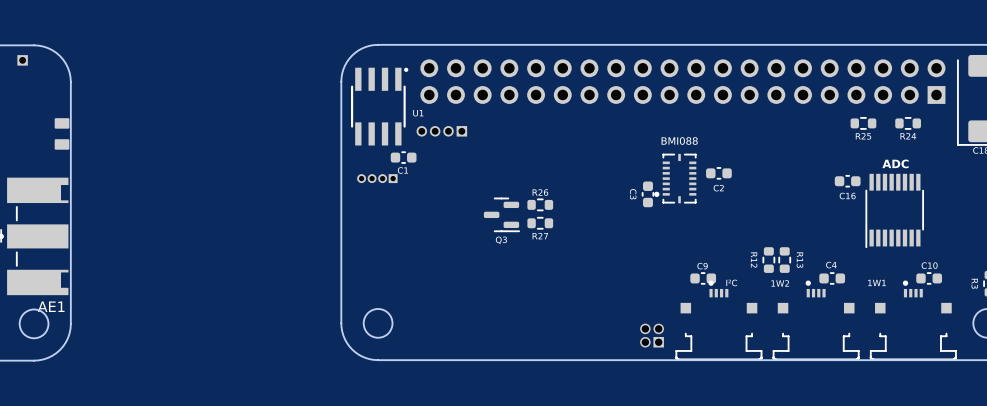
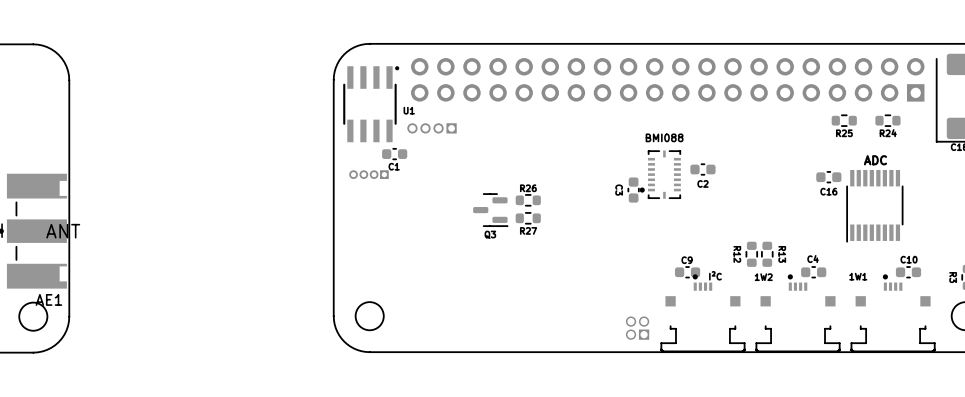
part: (22, 60) -> none
part: (62, 133) -> none
AE1 value: none -> ANT (63, 231)

